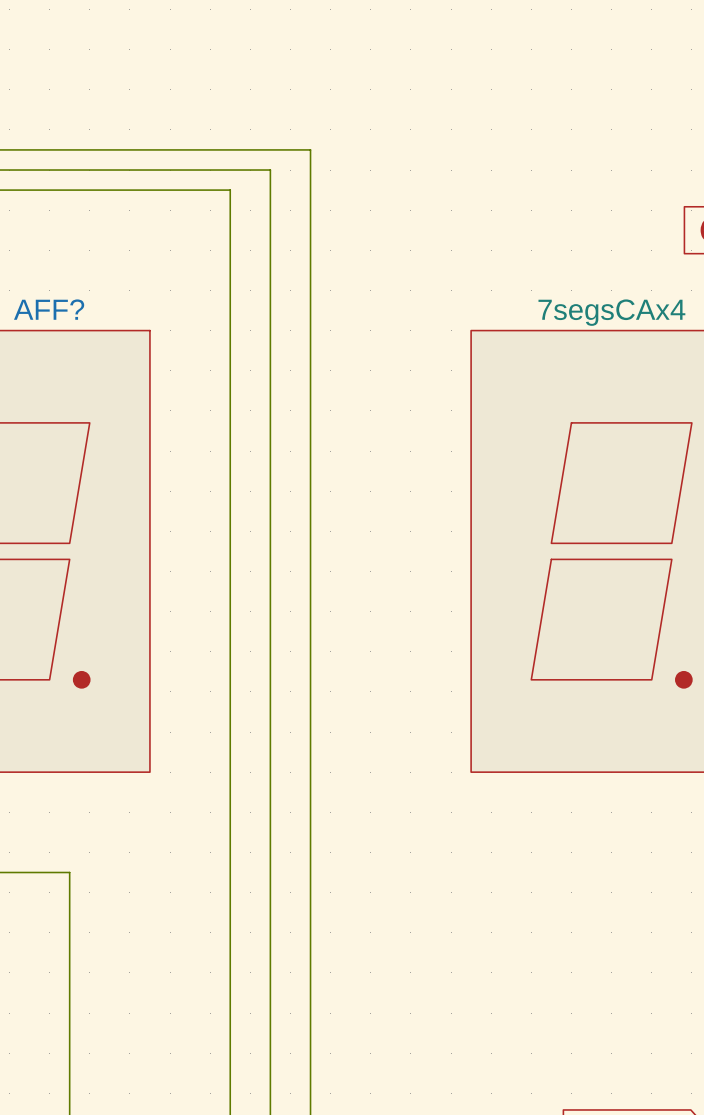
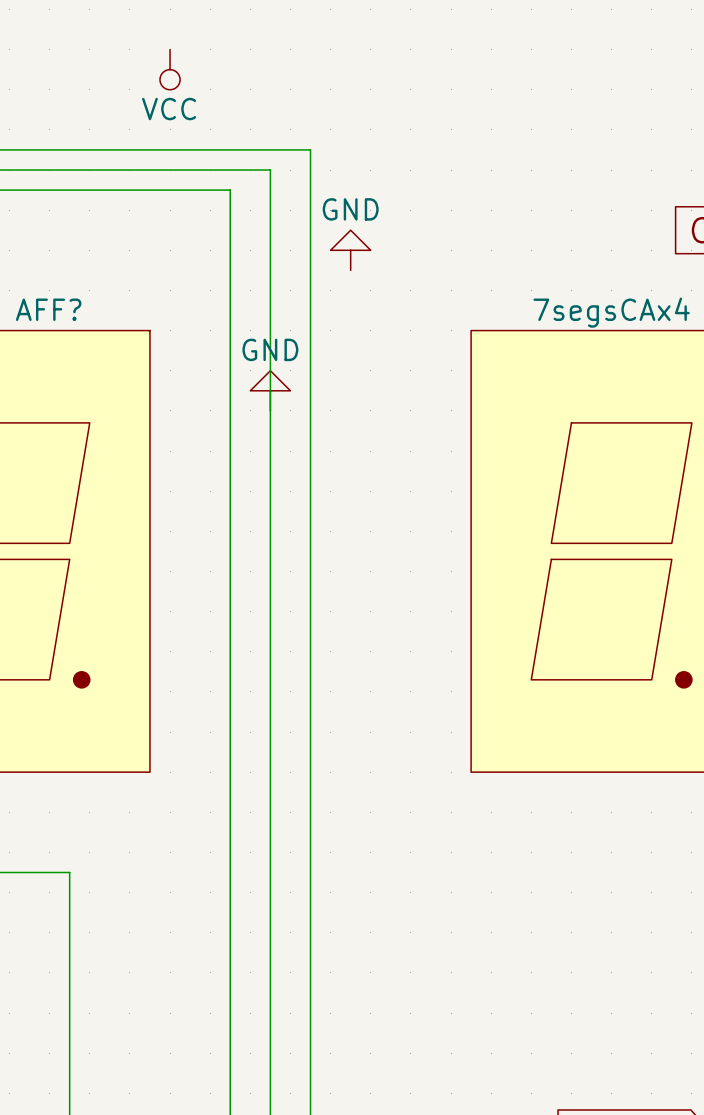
power symbol: none -> VCC (170, 69)
power symbol: none -> GND (350, 250)
power symbol: none -> GND (270, 390)

